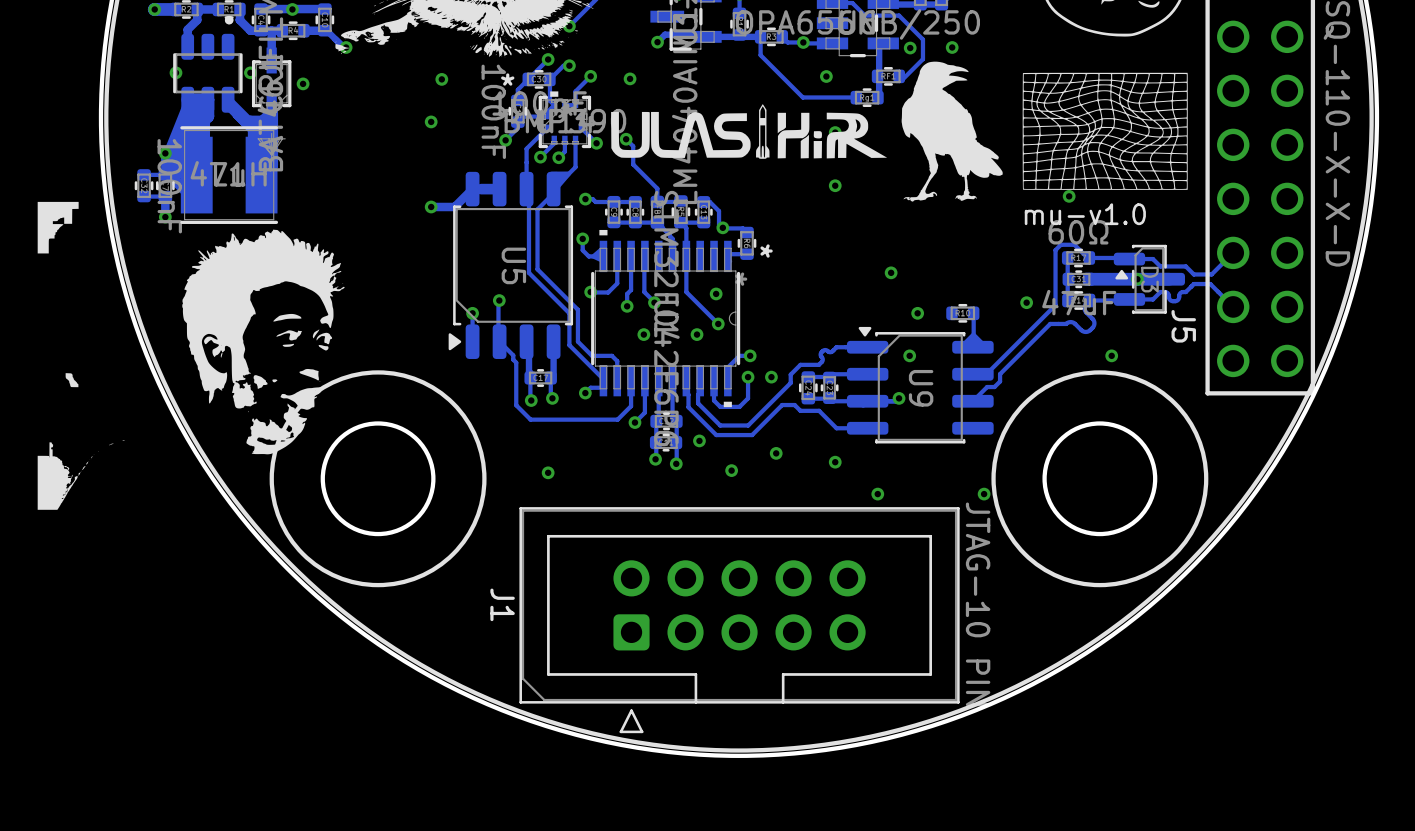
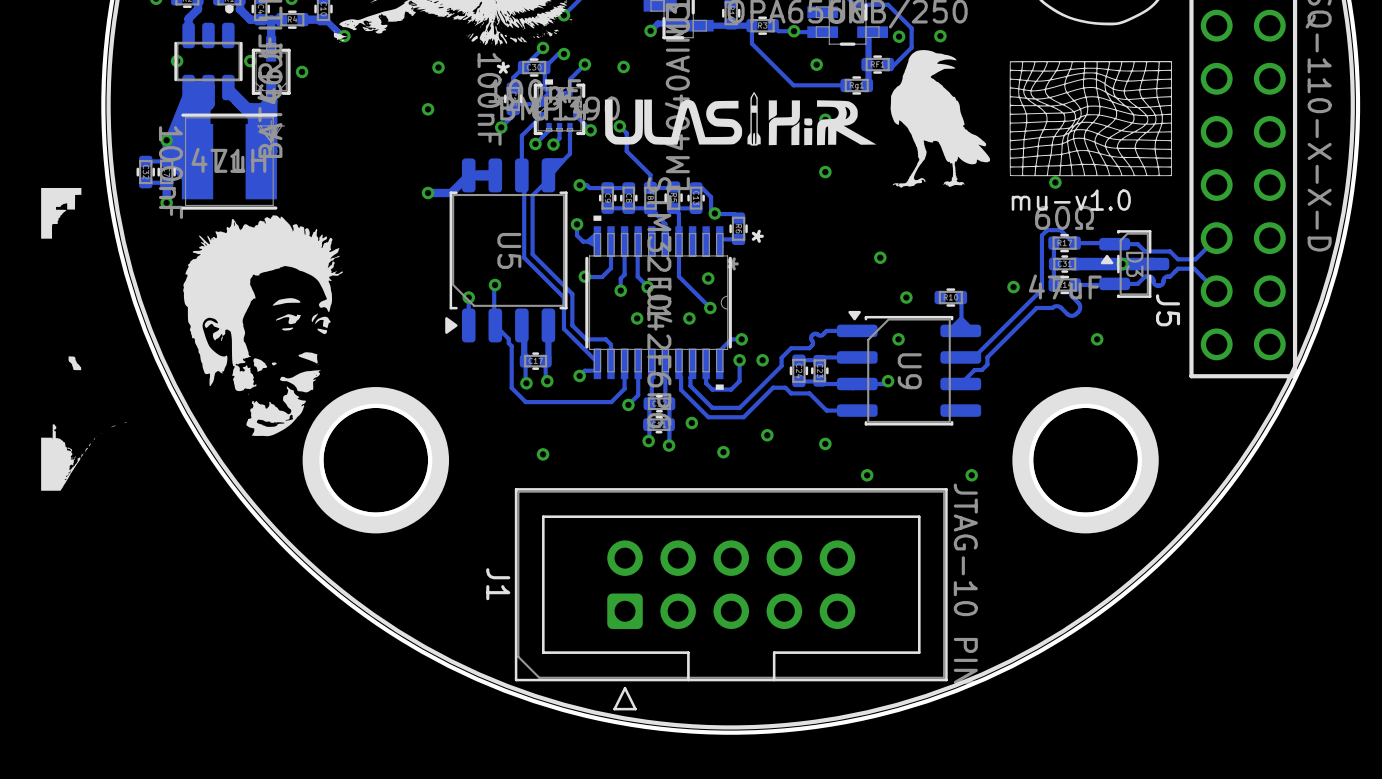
drawing shape: [269, 370, 487, 588] -> [302, 387, 450, 534]
drawing shape: [991, 370, 1209, 588] -> [1012, 387, 1159, 534]

